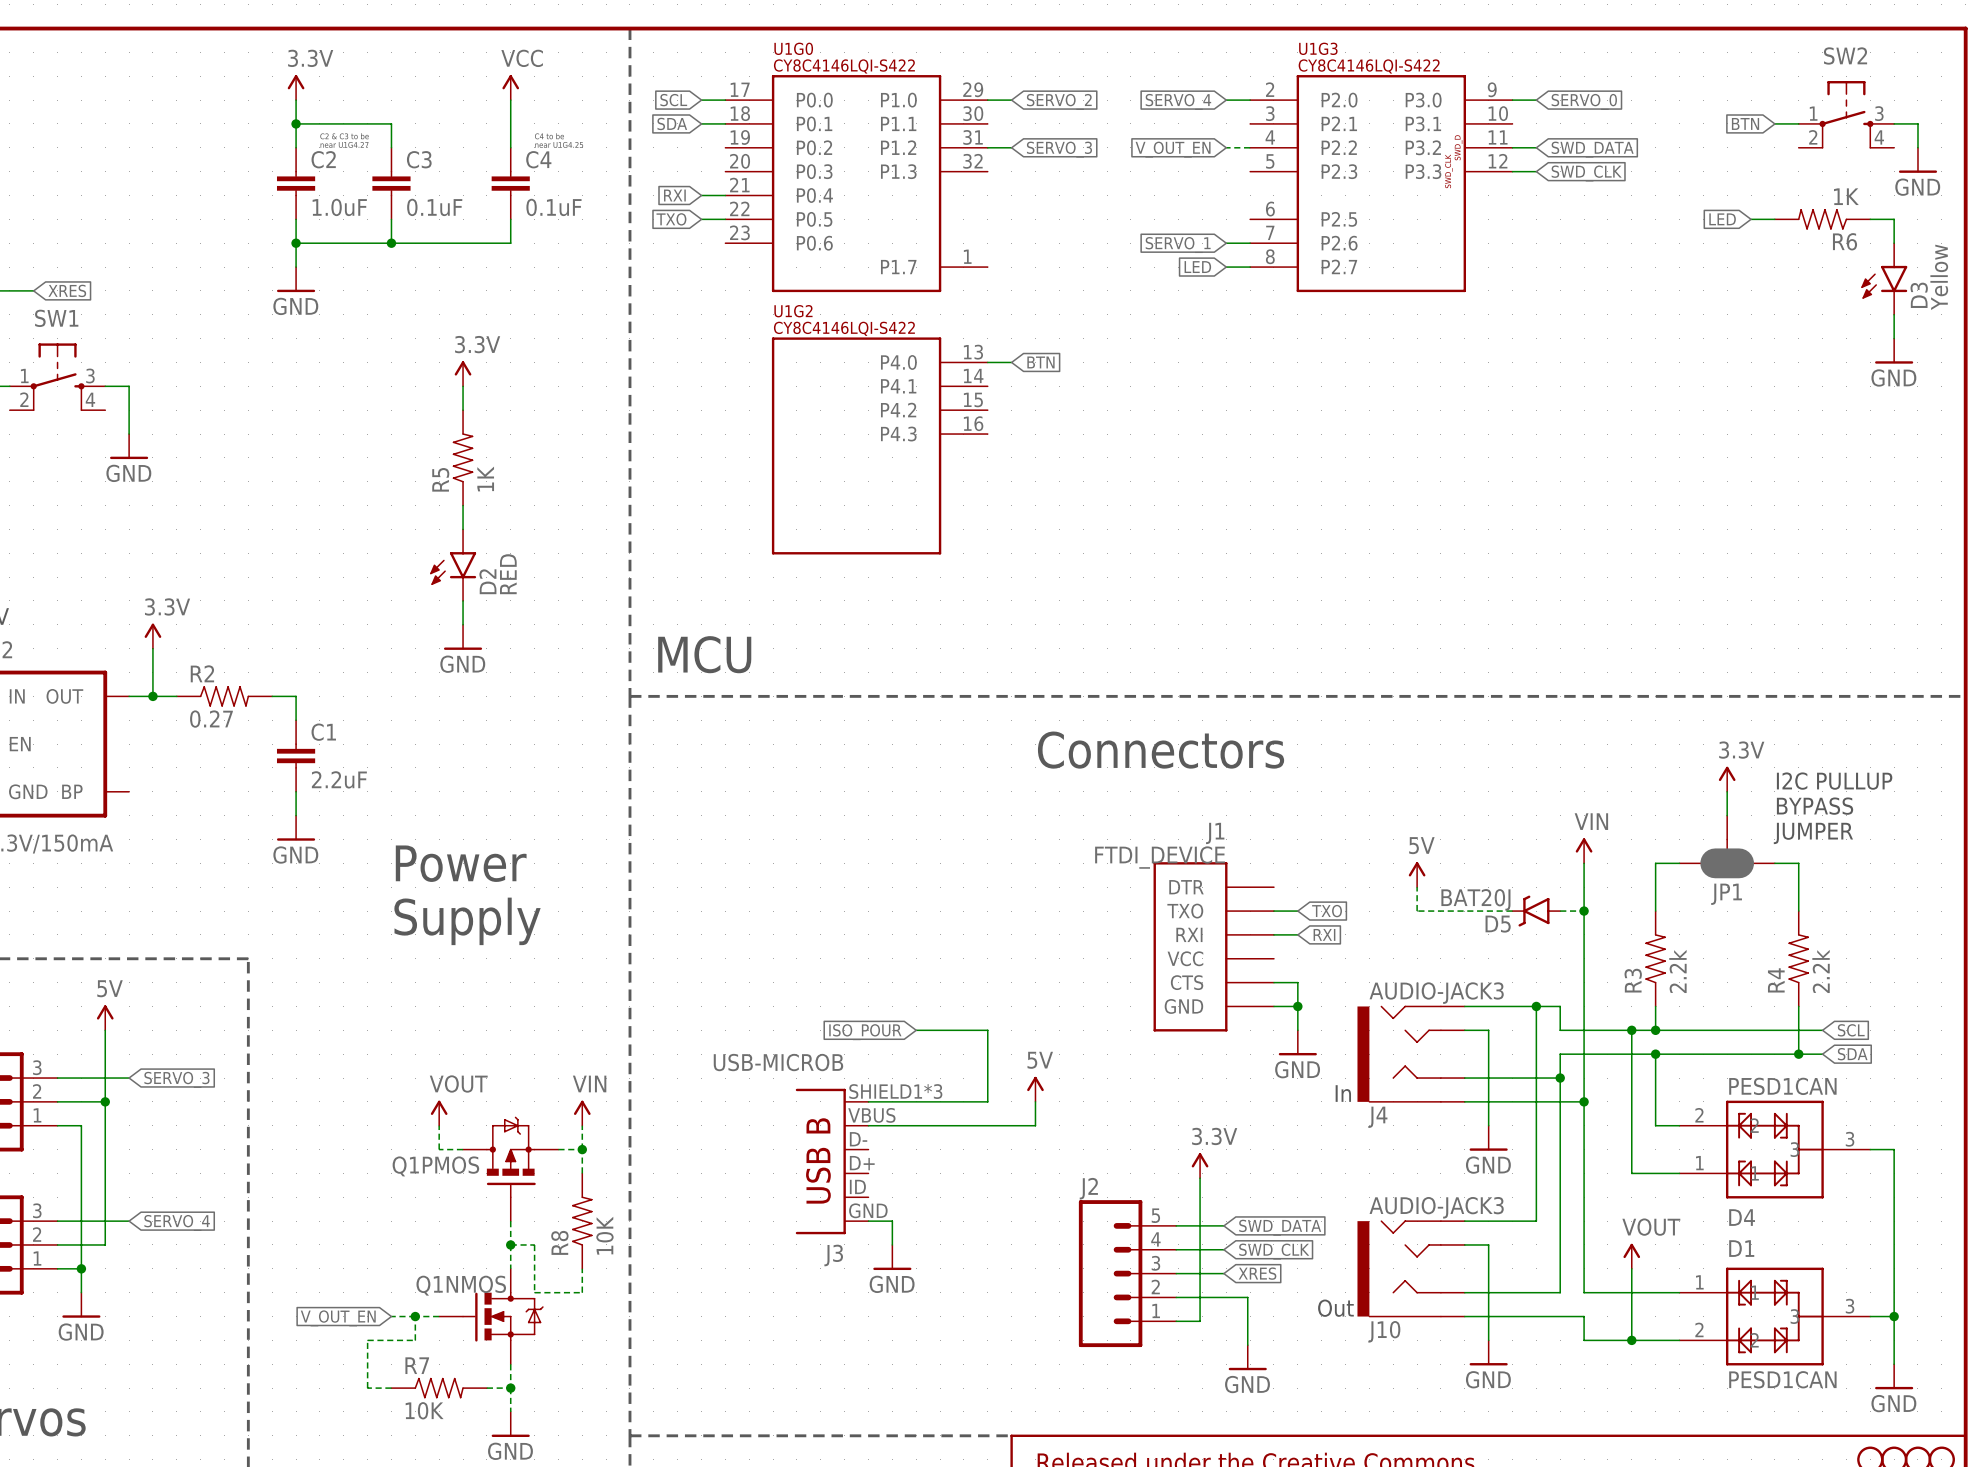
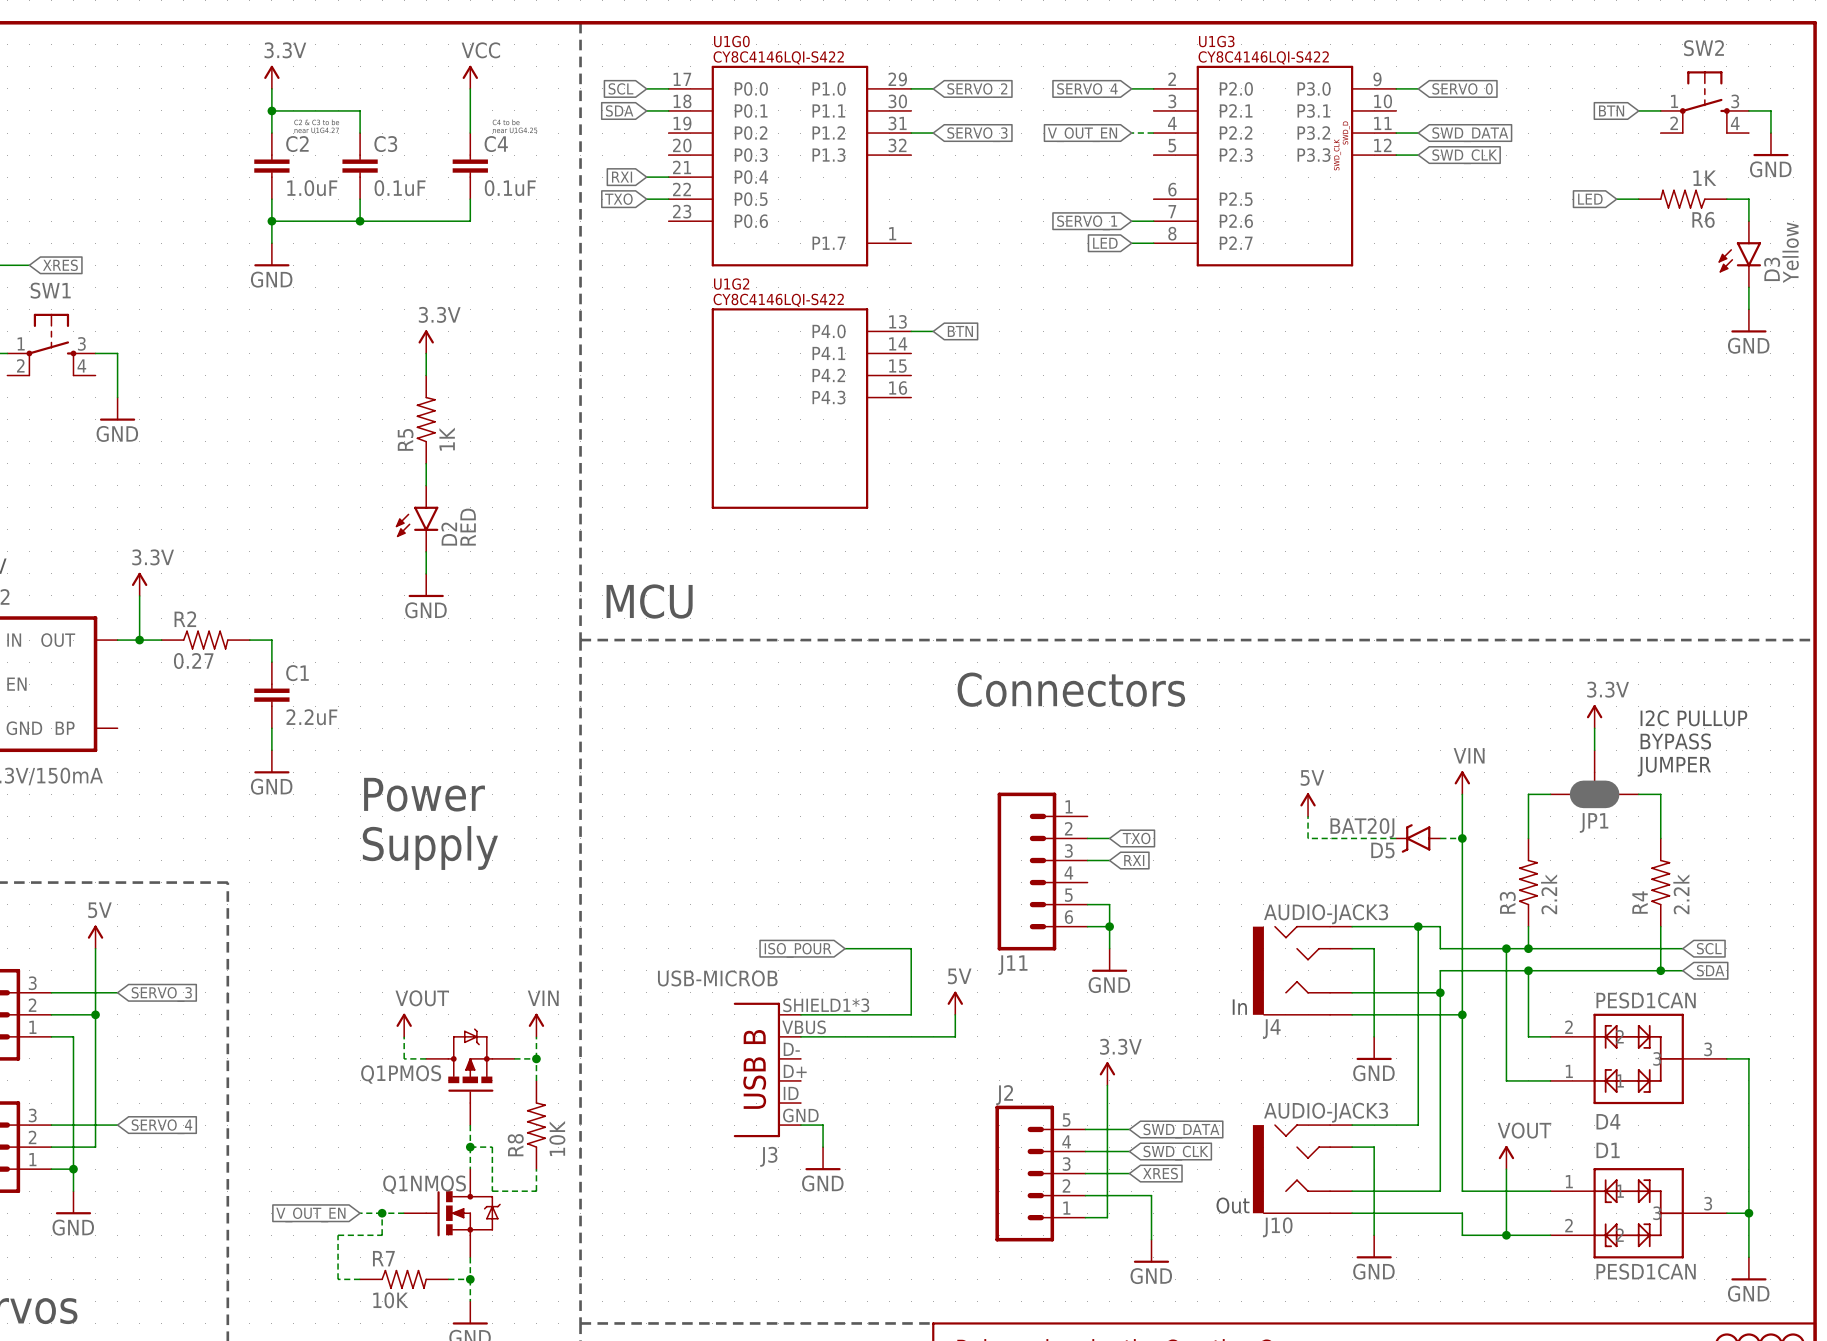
wire: (1273, 911) (1297, 911) -> (1087, 838) (1109, 838)
global label position: TXO (1327, 911) -> TXO (1136, 838)
wire: (1273, 934) (1297, 934) -> (1087, 860) (1109, 860)
global label position: RXI (1324, 934) -> RXI (1134, 860)
J11: none -> (1042, 871)
J1: FTDI_DEVICE (1213, 946) -> none
wire: (1273, 982) (1297, 982) (1297, 1030) -> (1087, 904) (1109, 904) (1109, 948)
junction: none -> (1109, 926)
wire: (1273, 1006) (1297, 1006) -> (1087, 926) (1109, 926)
junction: (1297, 1006) -> none
power symbol position: GND (1297, 1042) -> GND (1109, 960)

